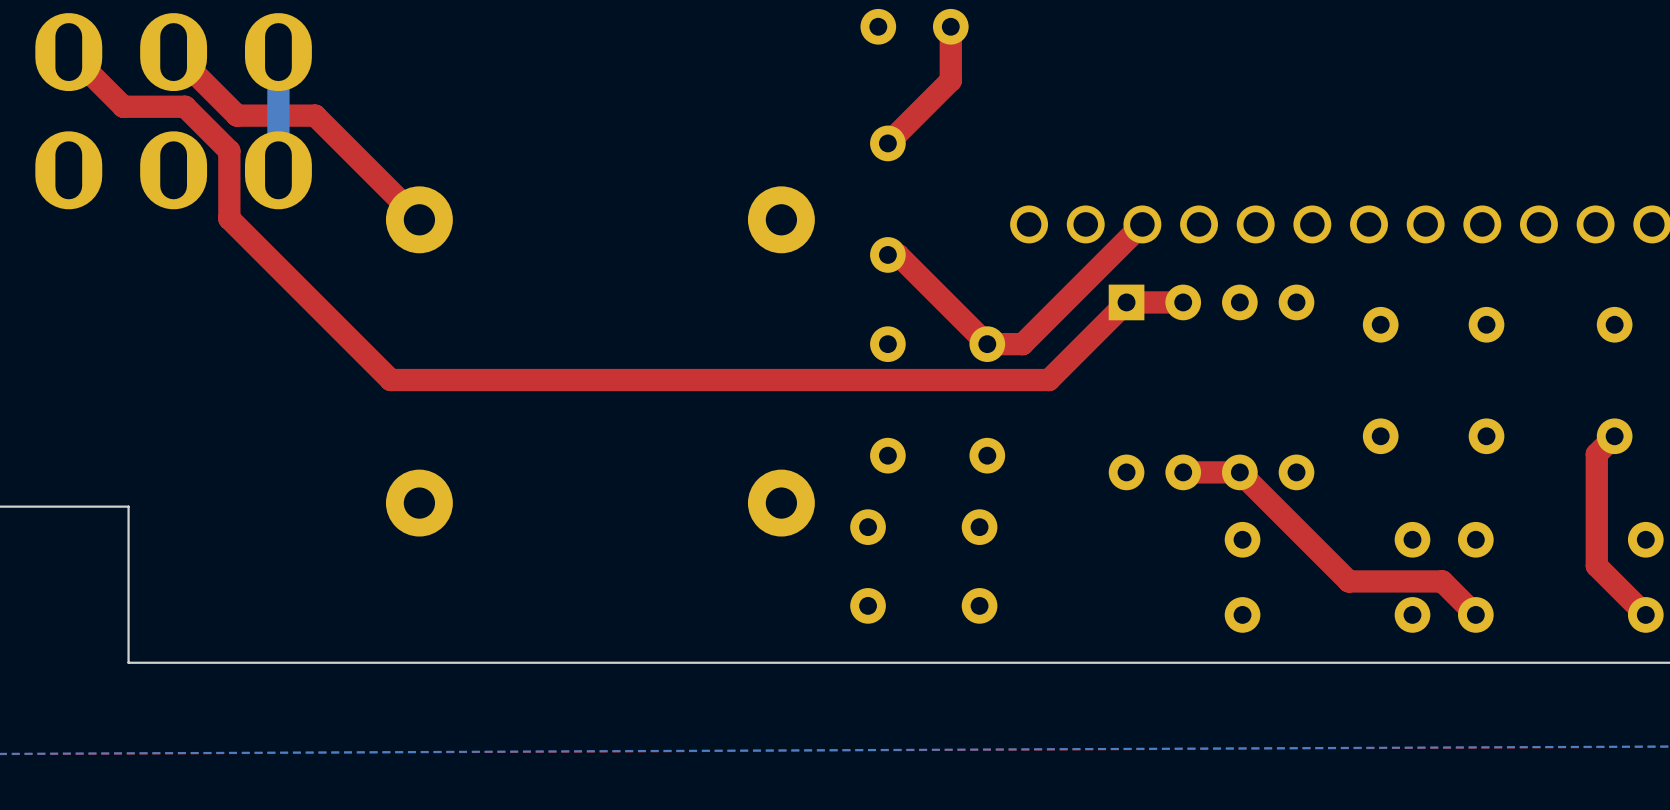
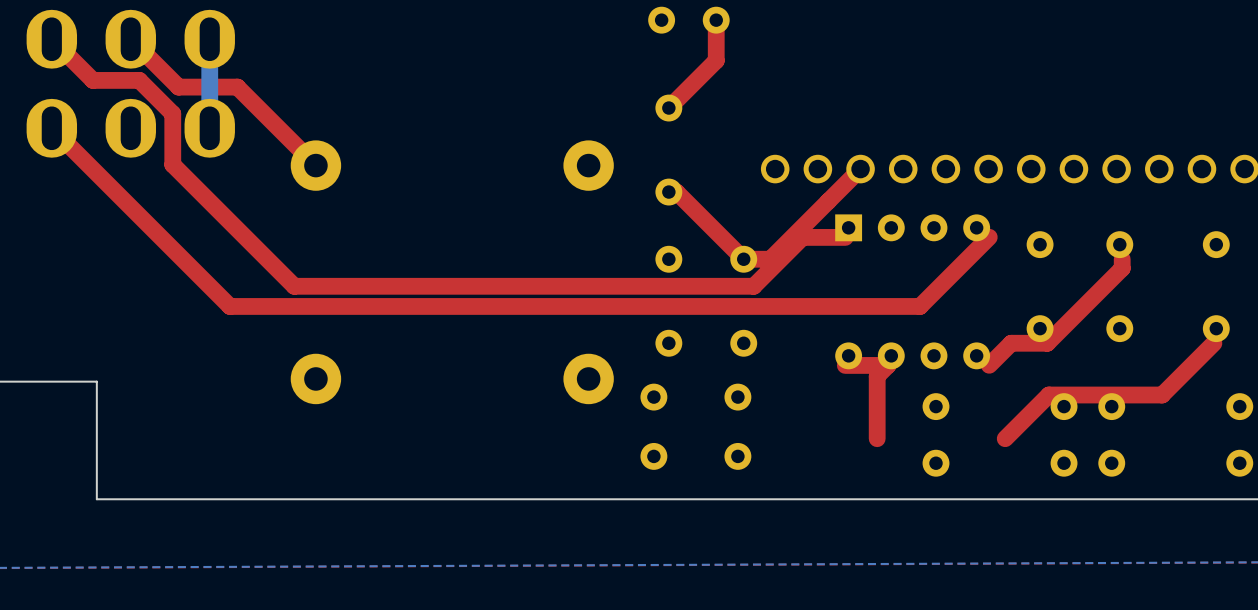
top track: none -> (51, 128) (229, 306) (920, 306) (989, 237)
top track: (1183, 302) (1126, 302) (1048, 380) (1000, 380) -> (845, 237) (802, 237) (753, 286)
top track: none -> (1122, 259) (1122, 268) (1047, 343) (1011, 343) (989, 365)
top track: (1614, 436) (1596, 454) (1596, 565) (1645, 614) -> none
top track: none -> (1213, 343) (1162, 395) (1048, 395) (1005, 438)
top track: (1183, 472) (1239, 472) (1348, 581) (1442, 581) (1475, 614) -> none
top track: none -> (845, 365) (888, 365) (877, 376) (877, 438)

